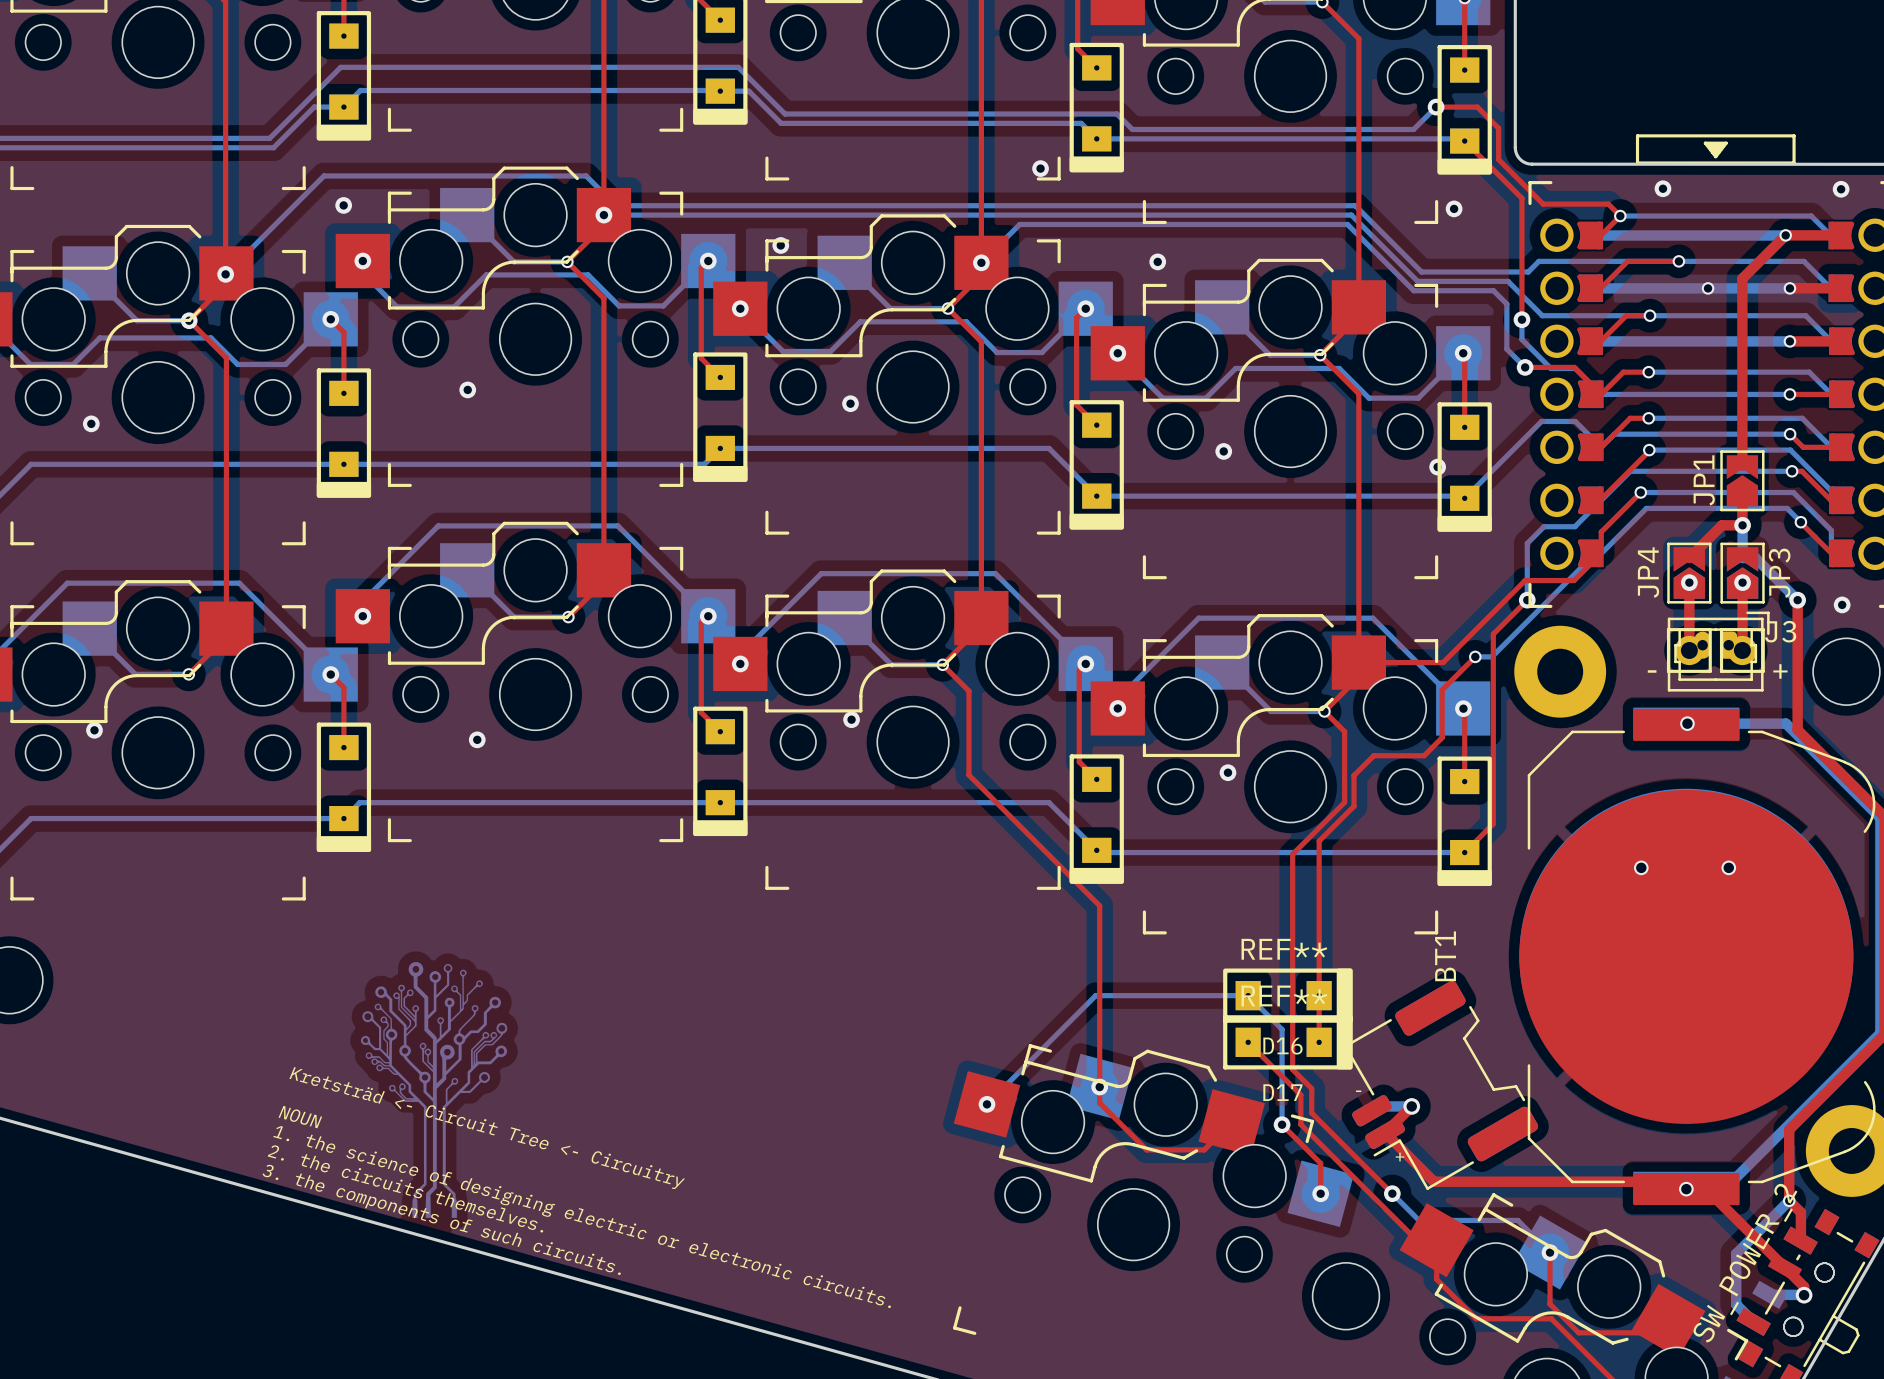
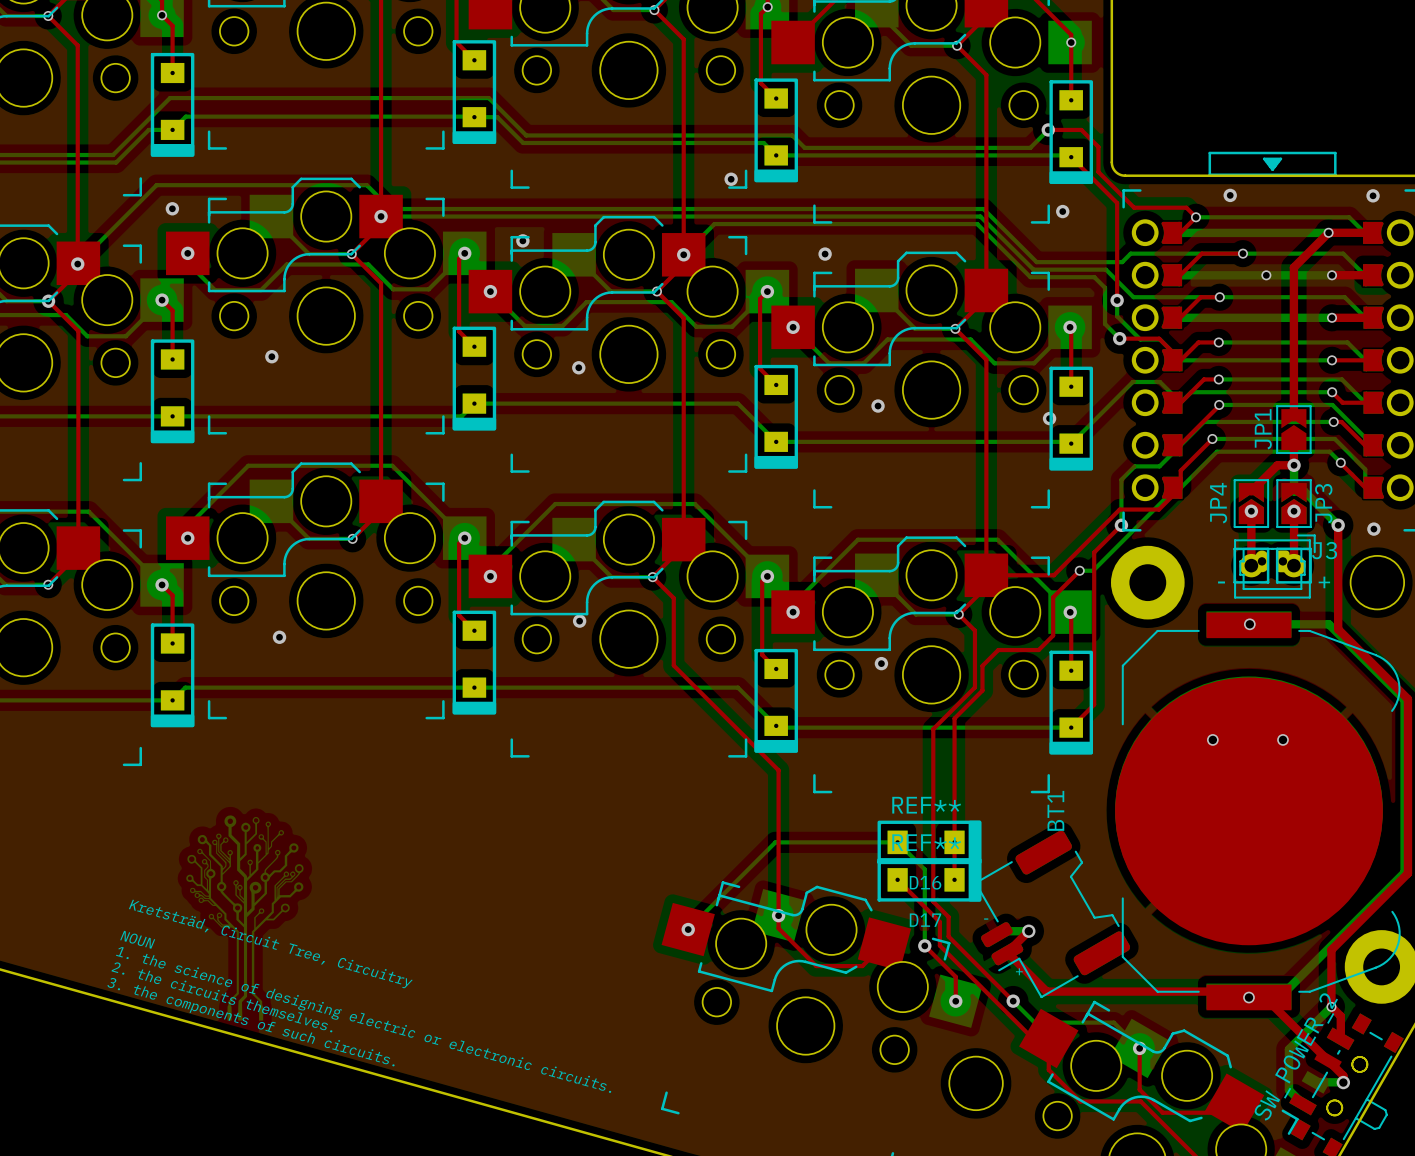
text: Kretsträd <- Circuit Tree <- Circuitry (487, 1128) -> Kretsträd, Circuit Tree, Circuitry (270, 943)

